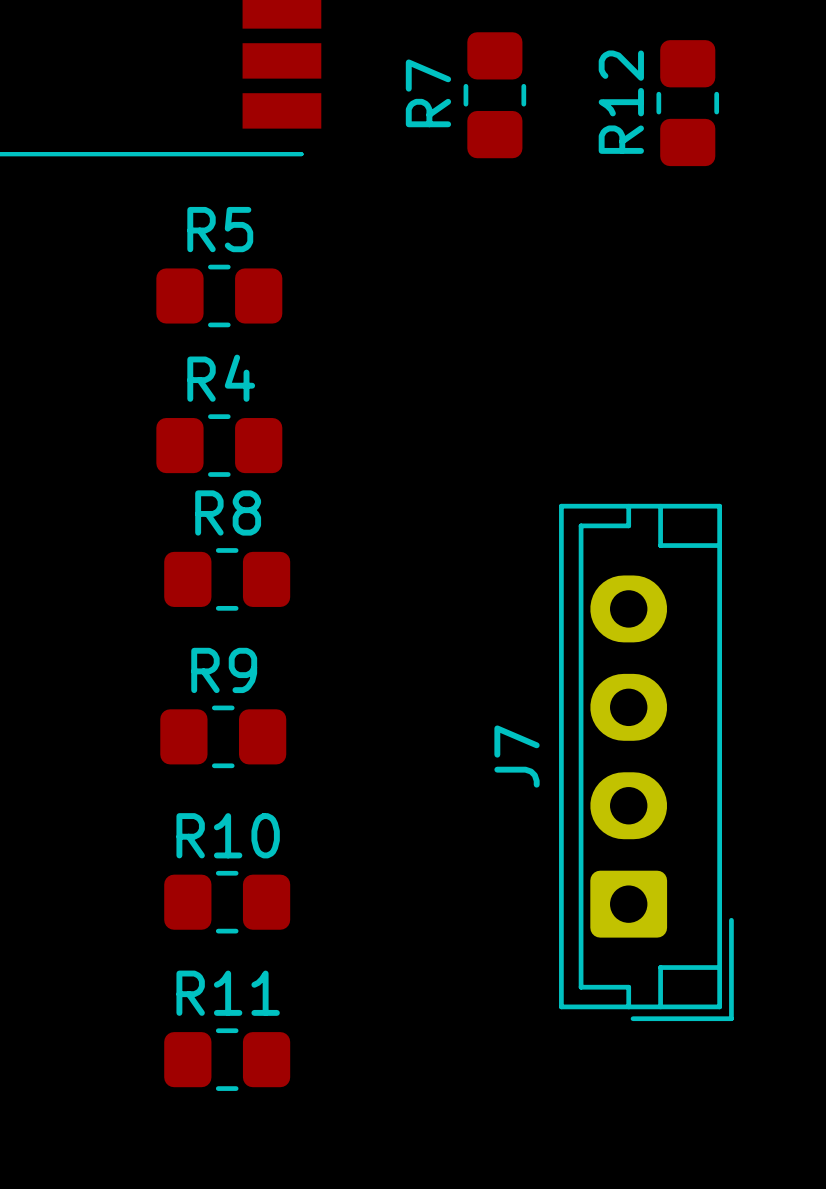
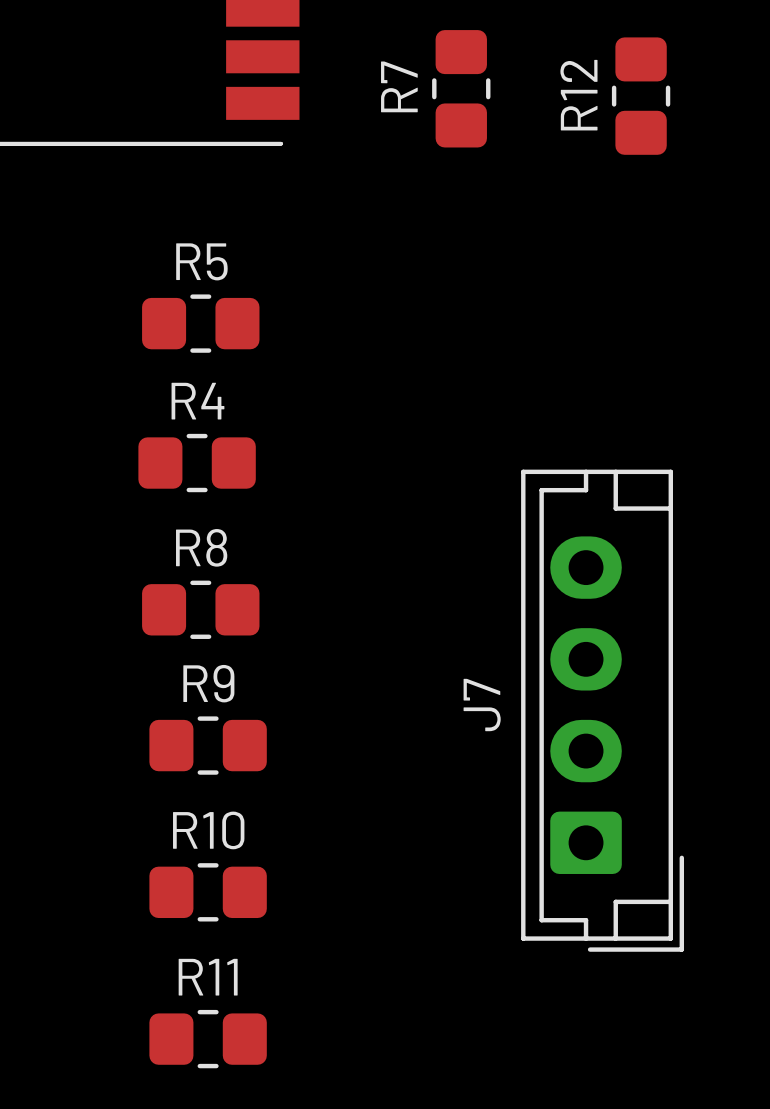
R5 position: (219, 295) -> (200, 323)
R4 position: (219, 445) -> (197, 463)
R8 position: (227, 579) -> (200, 609)
R9 position: (223, 736) -> (208, 745)
R10 position: (227, 902) -> (208, 892)
R11 position: (227, 1059) -> (208, 1039)

